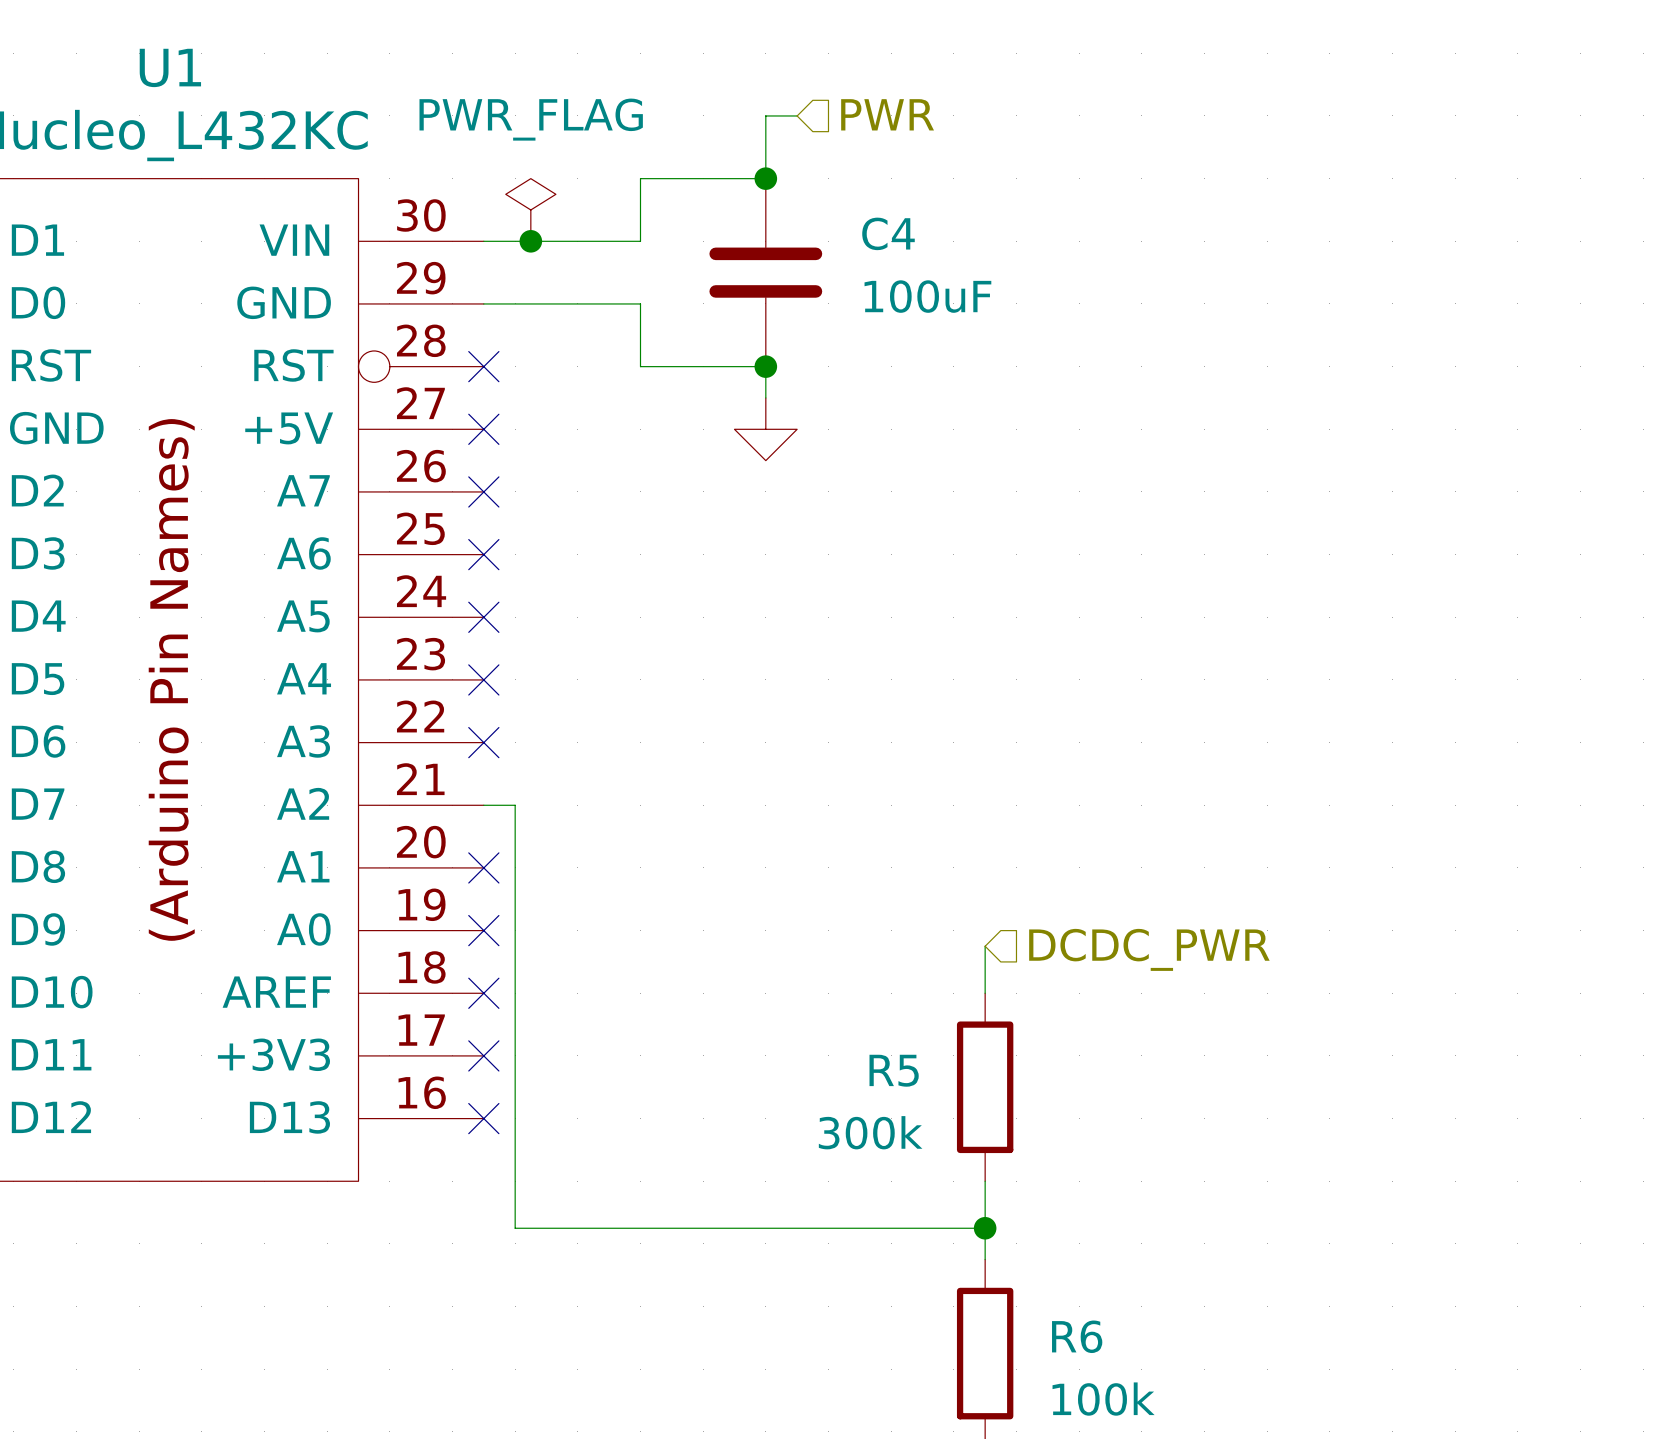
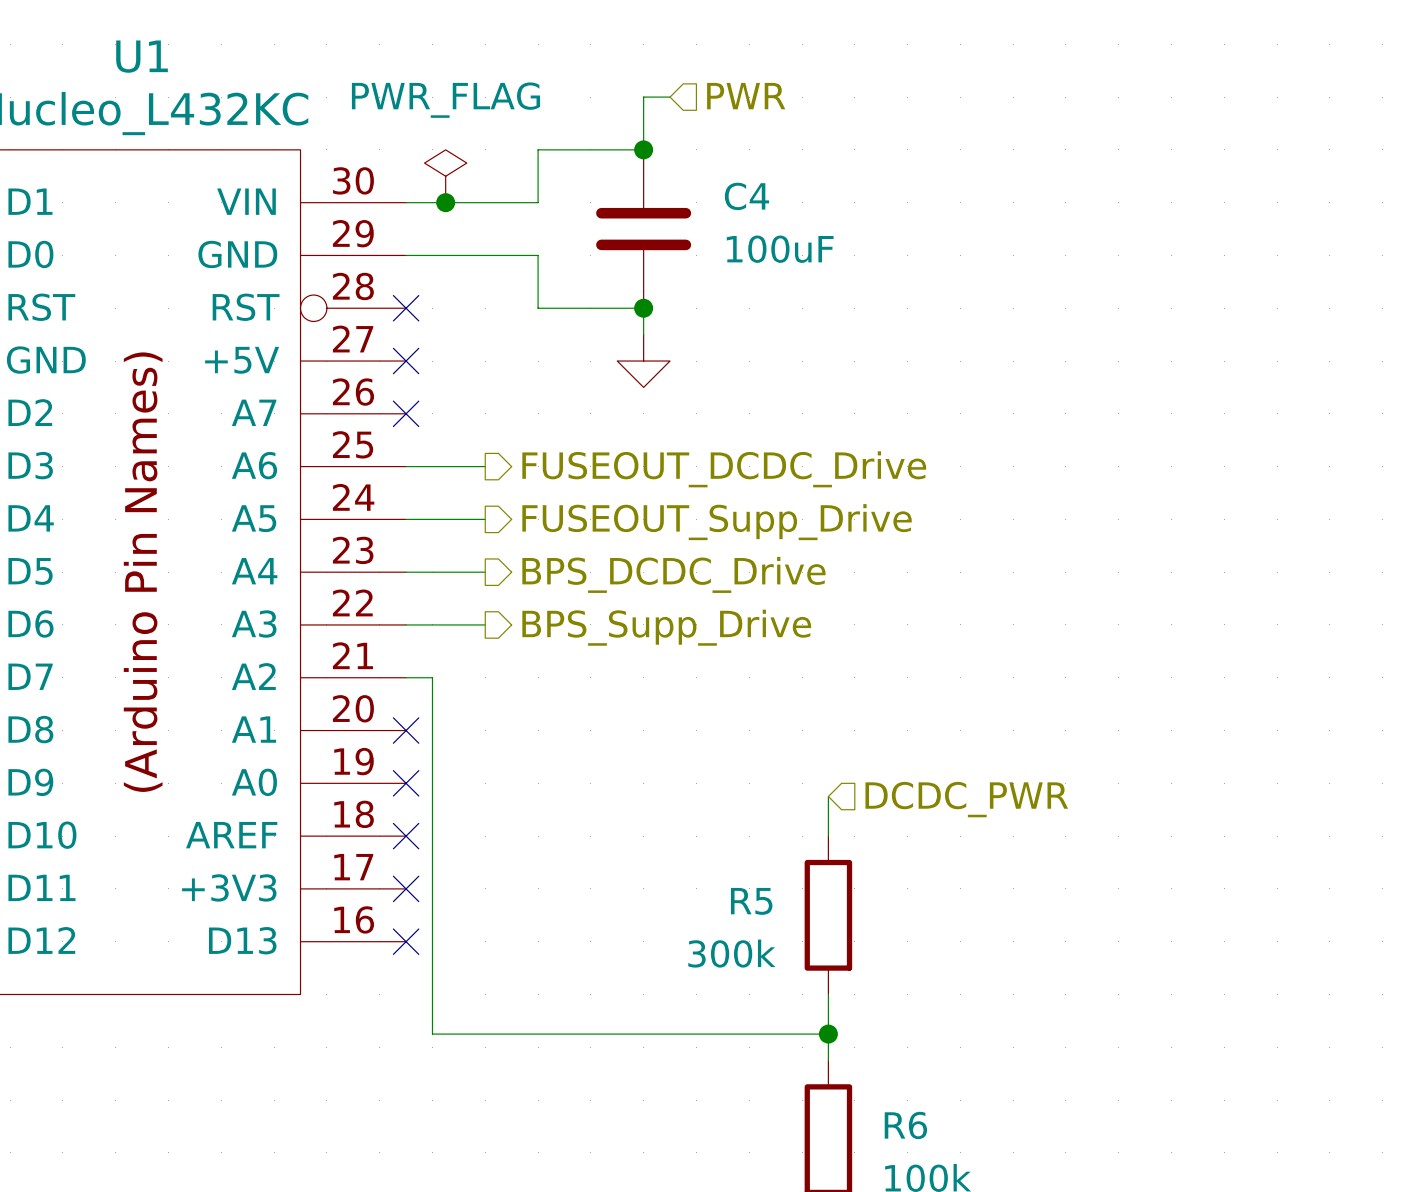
wire: none -> (406, 466) (485, 466)
no-connect mark: (483, 554) -> none
hierarchical label: none -> FUSEOUT_DCDC_Drive (724, 469)
wire: none -> (406, 519) (485, 519)
no-connect mark: (483, 617) -> none
hierarchical label: none -> FUSEOUT_Supp_Drive (717, 522)
wire: none -> (406, 572) (485, 572)
no-connect mark: (483, 679) -> none
hierarchical label: none -> BPS_DCDC_Drive (673, 574)
wire: none -> (406, 624) (485, 624)
no-connect mark: (483, 742) -> none
hierarchical label: none -> BPS_Supp_Drive (666, 627)

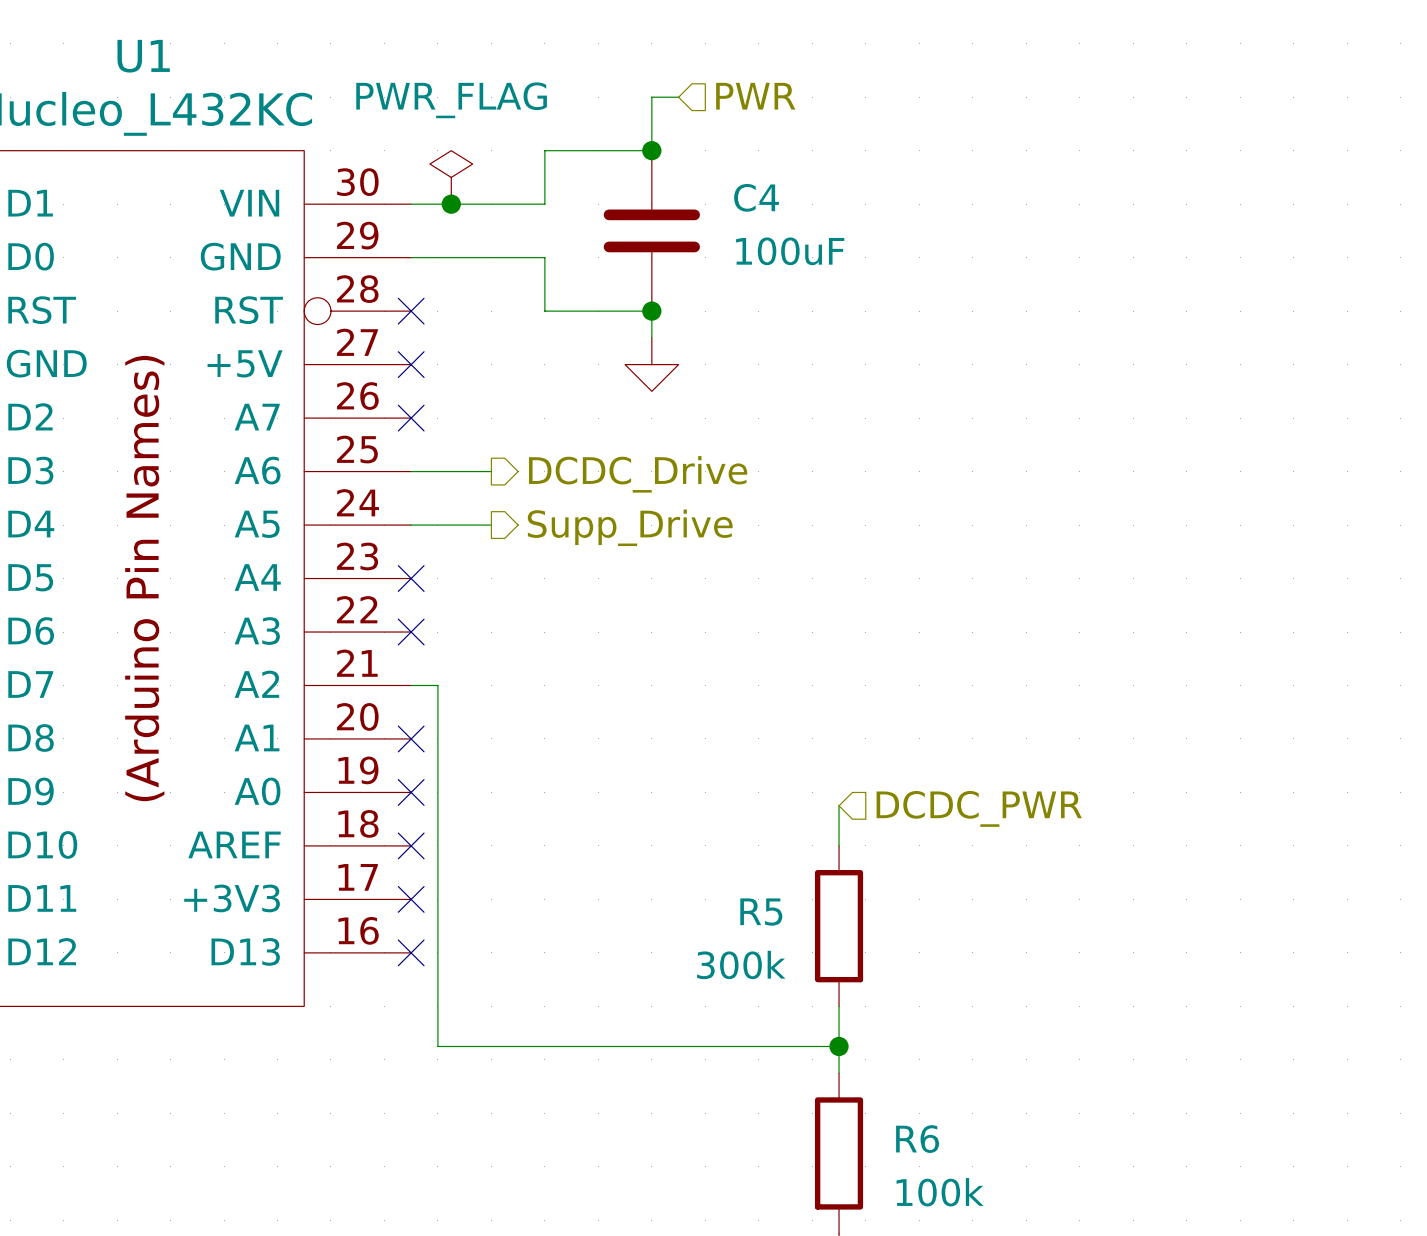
hierarchical label: FUSEOUT_DCDC_Drive (724, 469) -> DCDC_Drive (638, 474)
hierarchical label: FUSEOUT_Supp_Drive (717, 522) -> Supp_Drive (630, 527)
wire: (406, 572) (485, 572) -> none
no-connect mark: none -> (411, 578)
hierarchical label: BPS_DCDC_Drive (673, 574) -> none
wire: (406, 624) (485, 624) -> none
no-connect mark: none -> (411, 632)
hierarchical label: BPS_Supp_Drive (666, 627) -> none

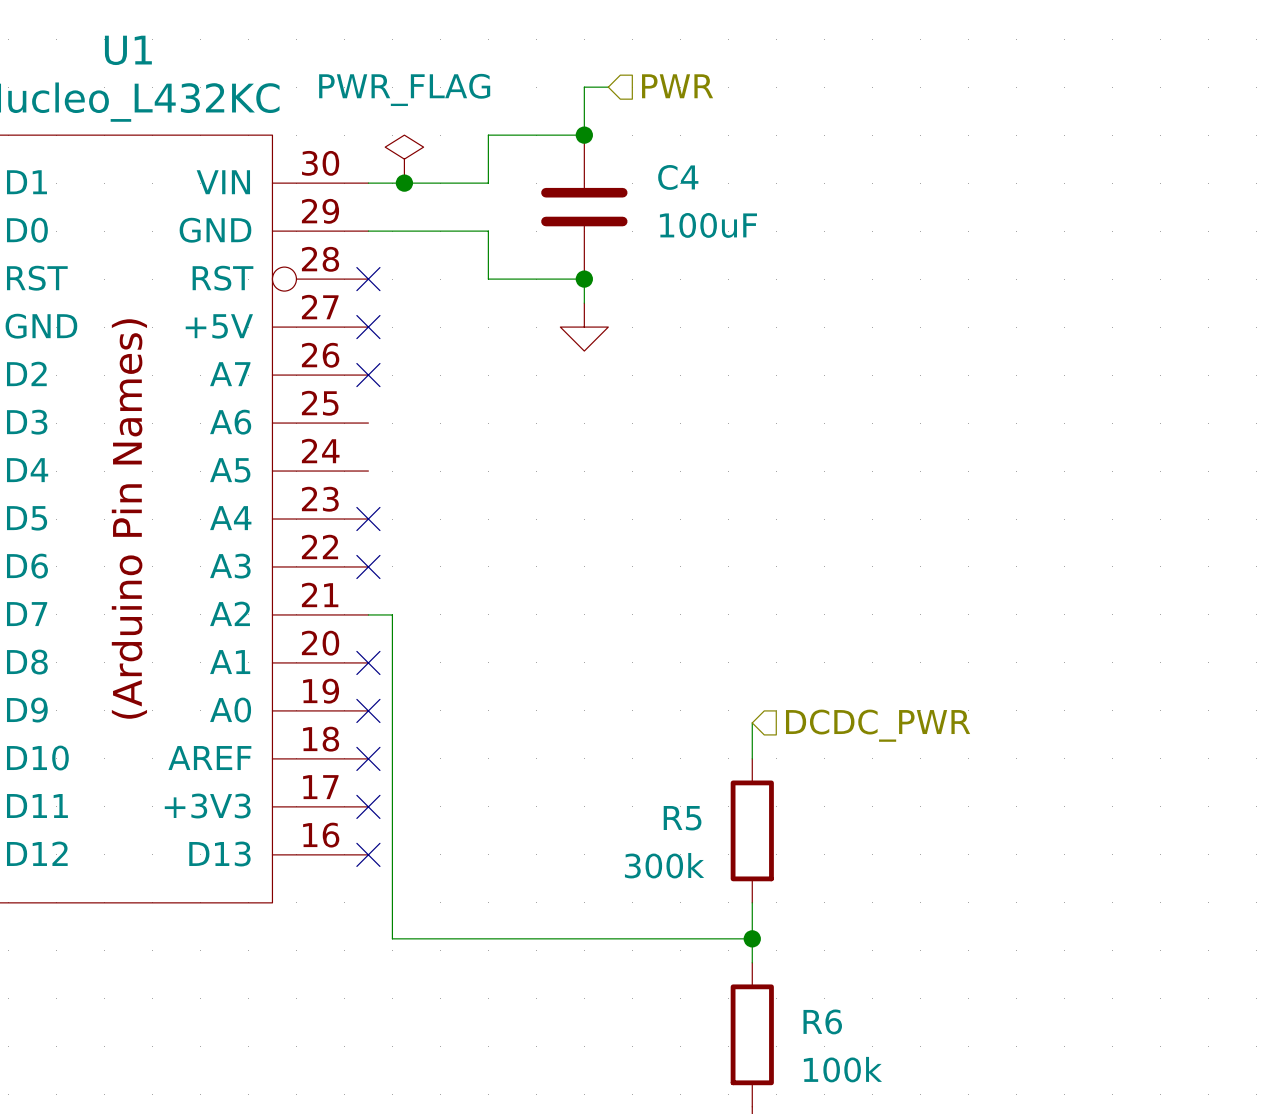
wire: (411, 471) (491, 471) -> none
hierarchical label: DCDC_Drive (638, 474) -> none
wire: (411, 525) (491, 525) -> none
hierarchical label: Supp_Drive (630, 527) -> none

